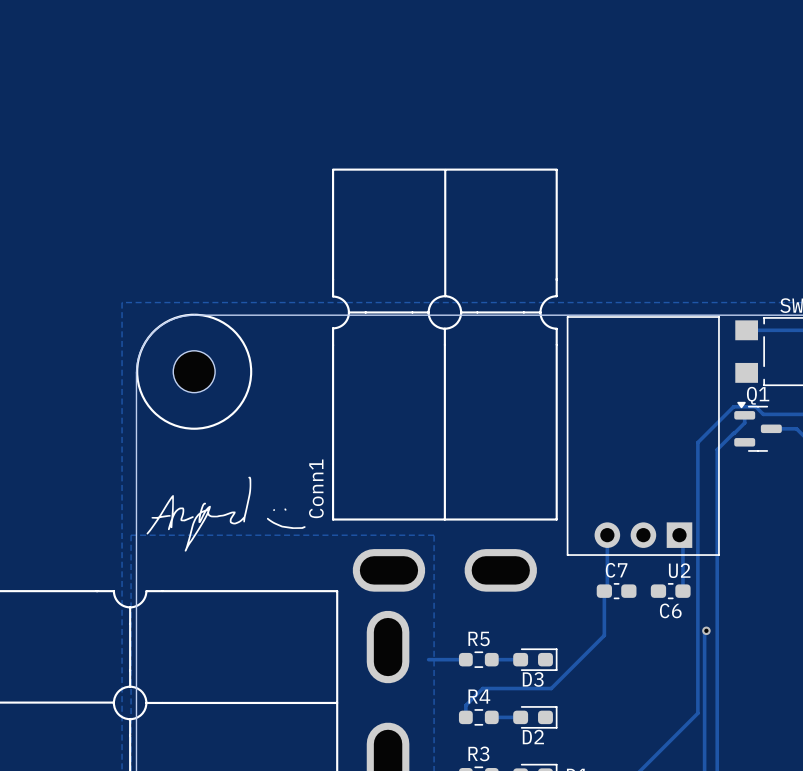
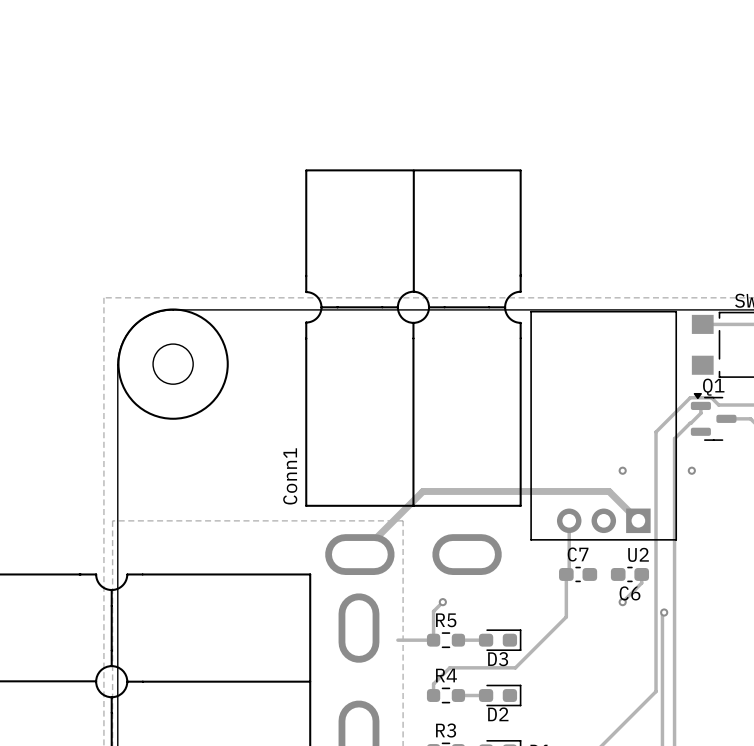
via: none -> (622, 470)
via: none -> (691, 470)
part: (226, 514) -> none
track: none -> (638, 520) (609, 491) (422, 491) (359, 554)
track: (682, 538) (682, 591) -> (622, 602) (641, 583) (641, 574)
track: none -> (442, 602) (433, 611) (433, 640)
via: none -> (442, 602)
via: none -> (622, 602)

